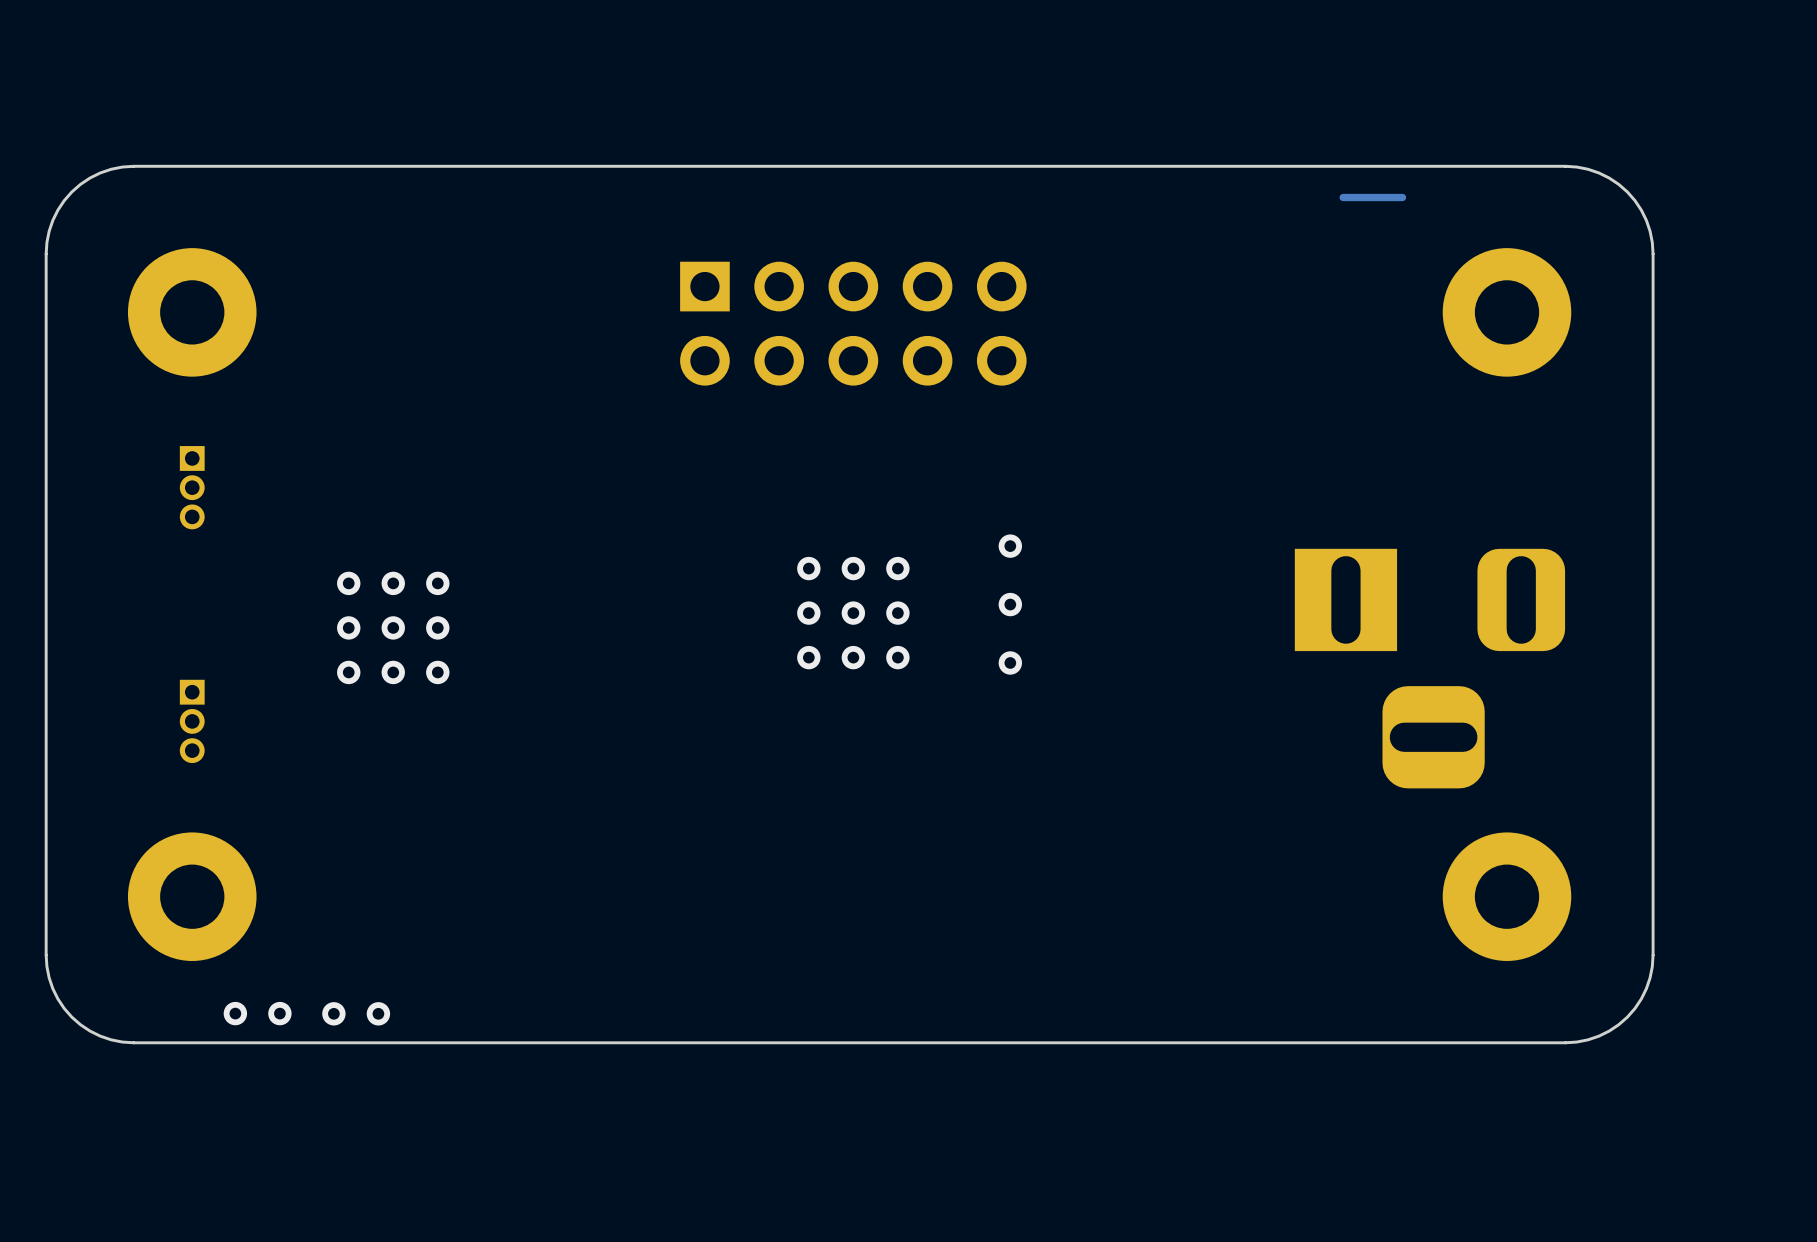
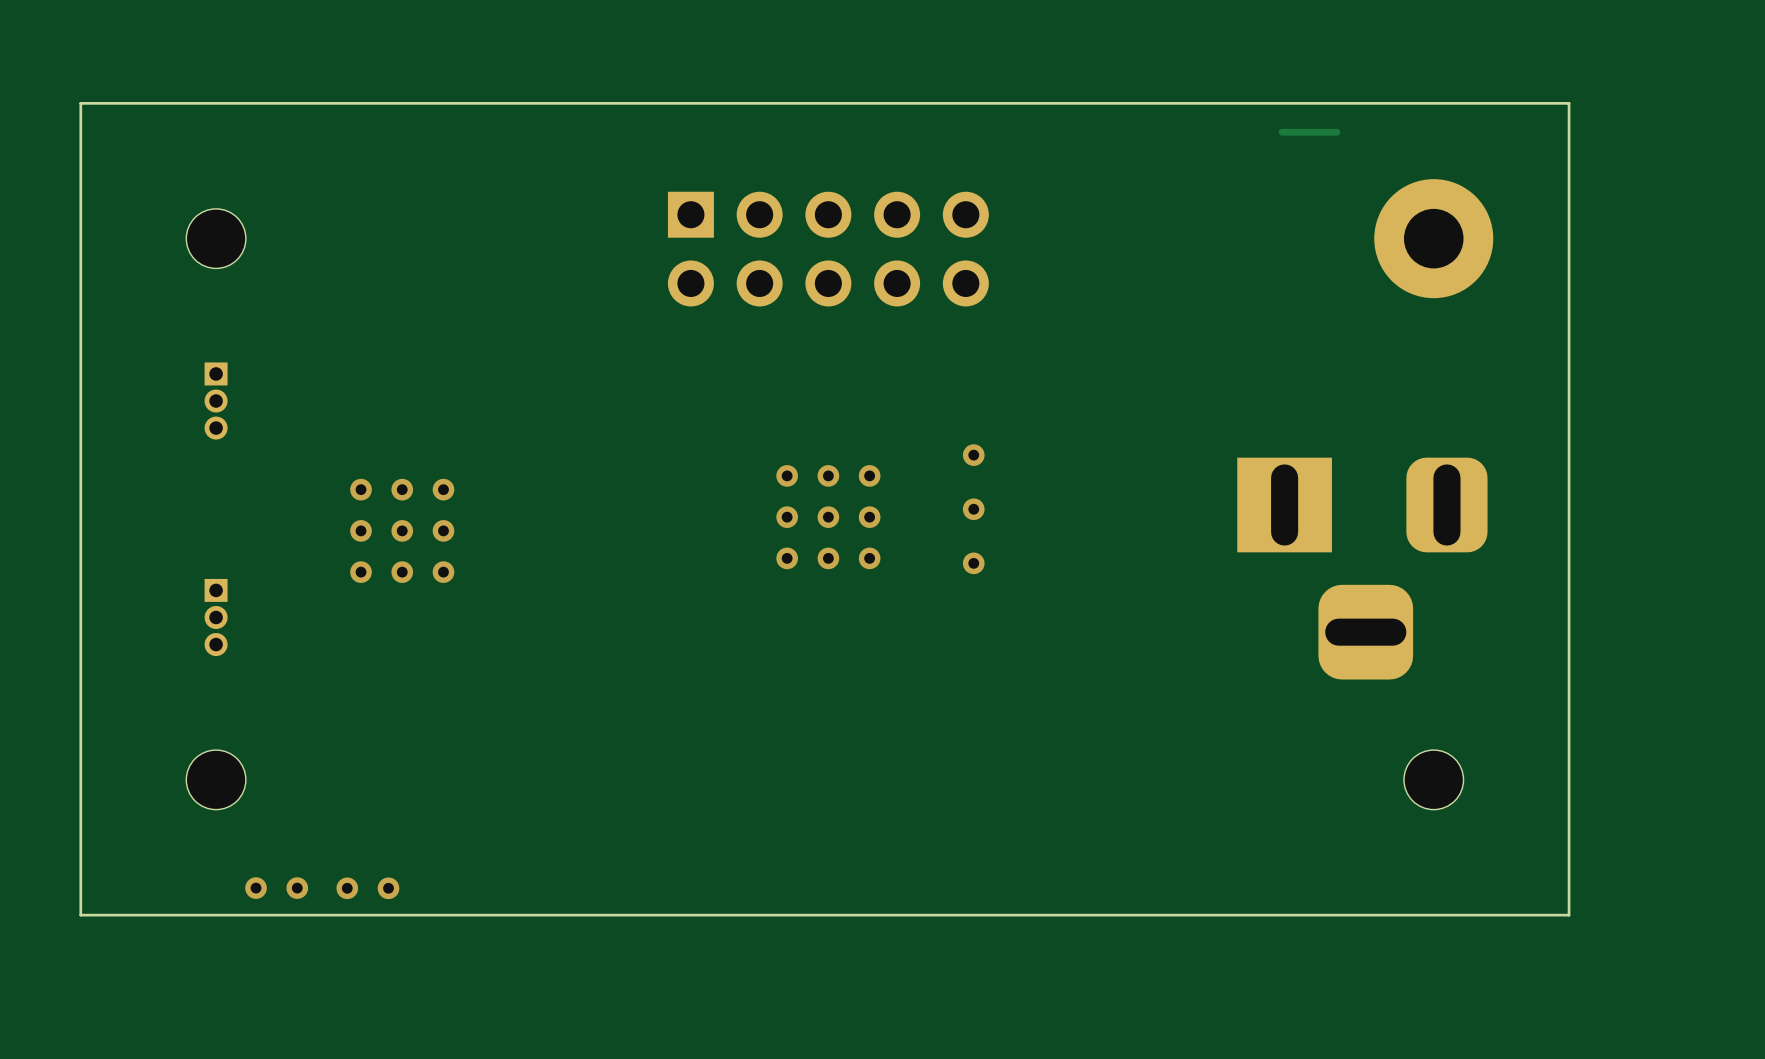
board edge: (133, 166) (100, 172) (71, 191) (52, 220) (46, 253) -> (161, 103) (80, 103) (80, 184)
board edge: (1565, 166) (1598, 172) (1627, 191) (1646, 220) (1653, 253) -> (1487, 103) (1569, 103) (1569, 184)
part footprint: [127, 248, 257, 377] -> [186, 208, 246, 269]
part footprint: [127, 832, 257, 961] -> [186, 750, 246, 810]
part footprint: [1442, 832, 1572, 961] -> [1403, 750, 1464, 810]
board edge: (46, 955) (52, 988) (71, 1017) (100, 1036) (133, 1042) -> (80, 833) (80, 915) (161, 915)
board edge: (1653, 955) (1646, 988) (1627, 1017) (1598, 1036) (1565, 1042) -> (1569, 833) (1569, 915) (1487, 915)

